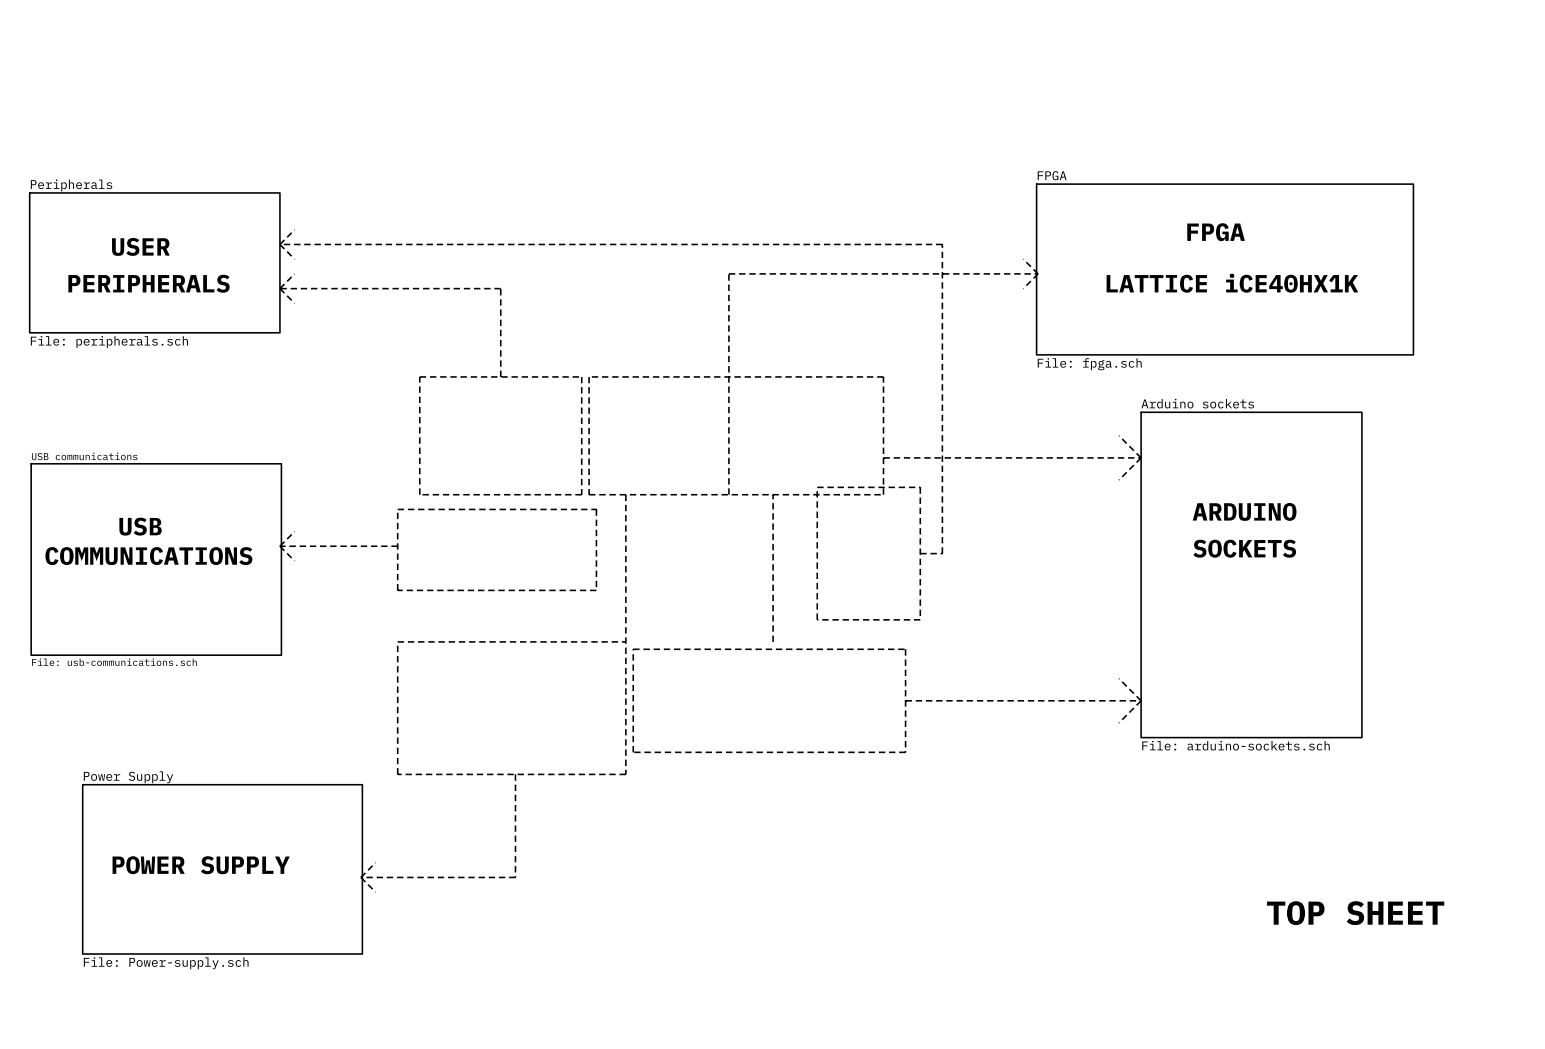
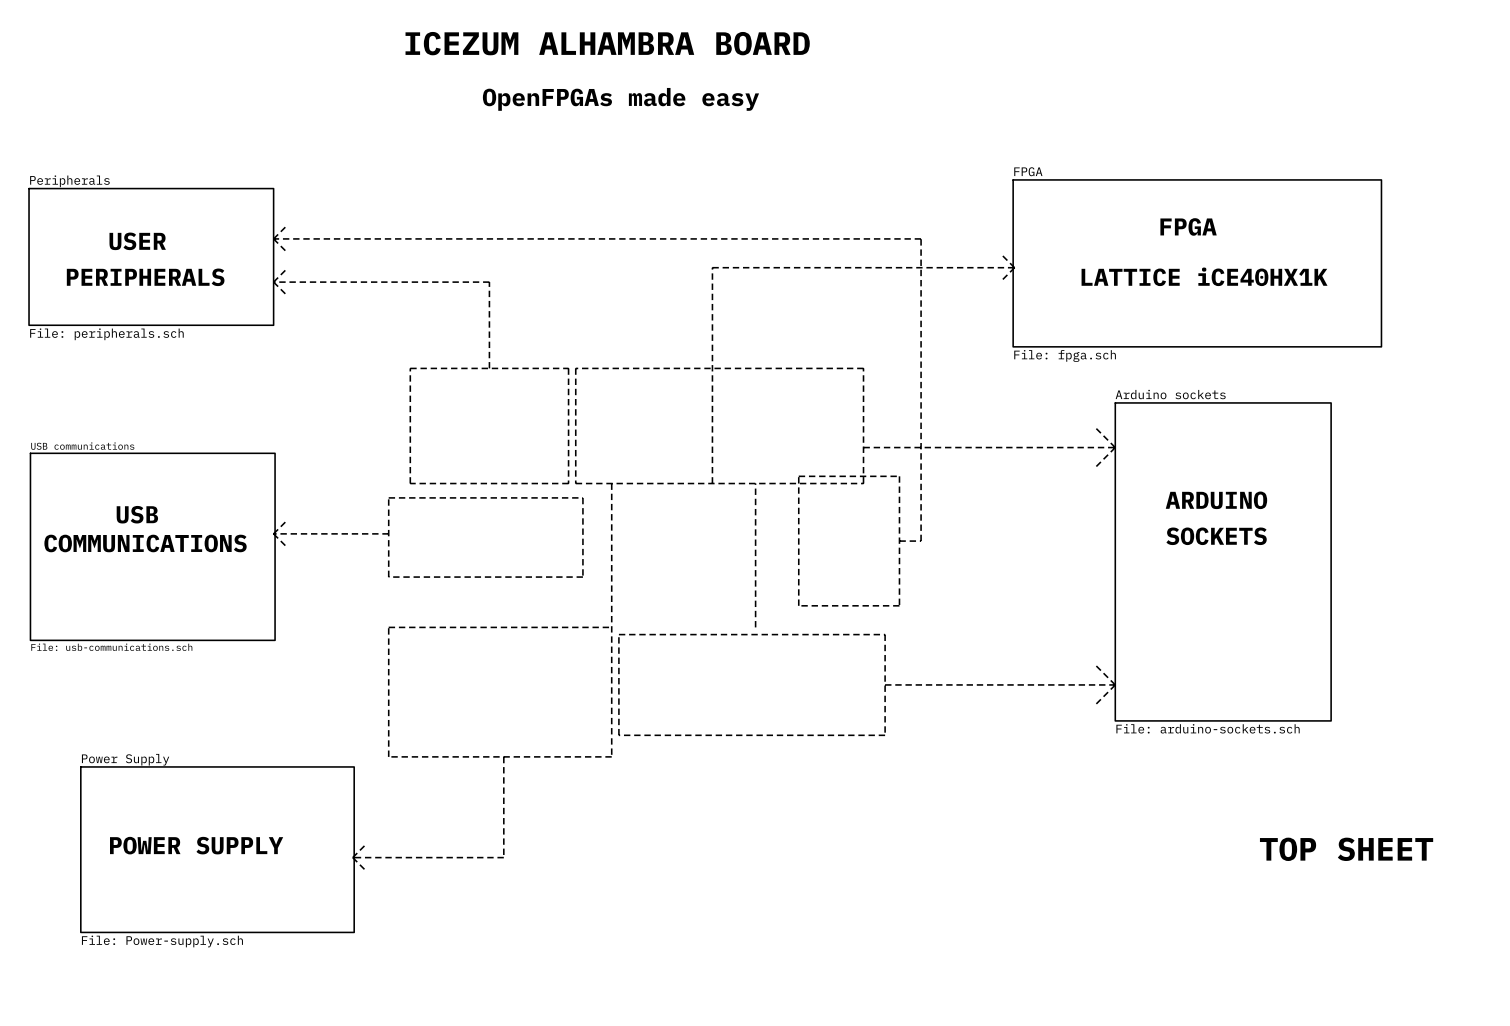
text: none -> ICEZUM ALHAMBRA BOARD (607, 43)
text: none -> OpenFPGAs made easy (620, 99)
text position: TOP SHEET (1355, 913) -> TOP SHEET (1346, 849)

